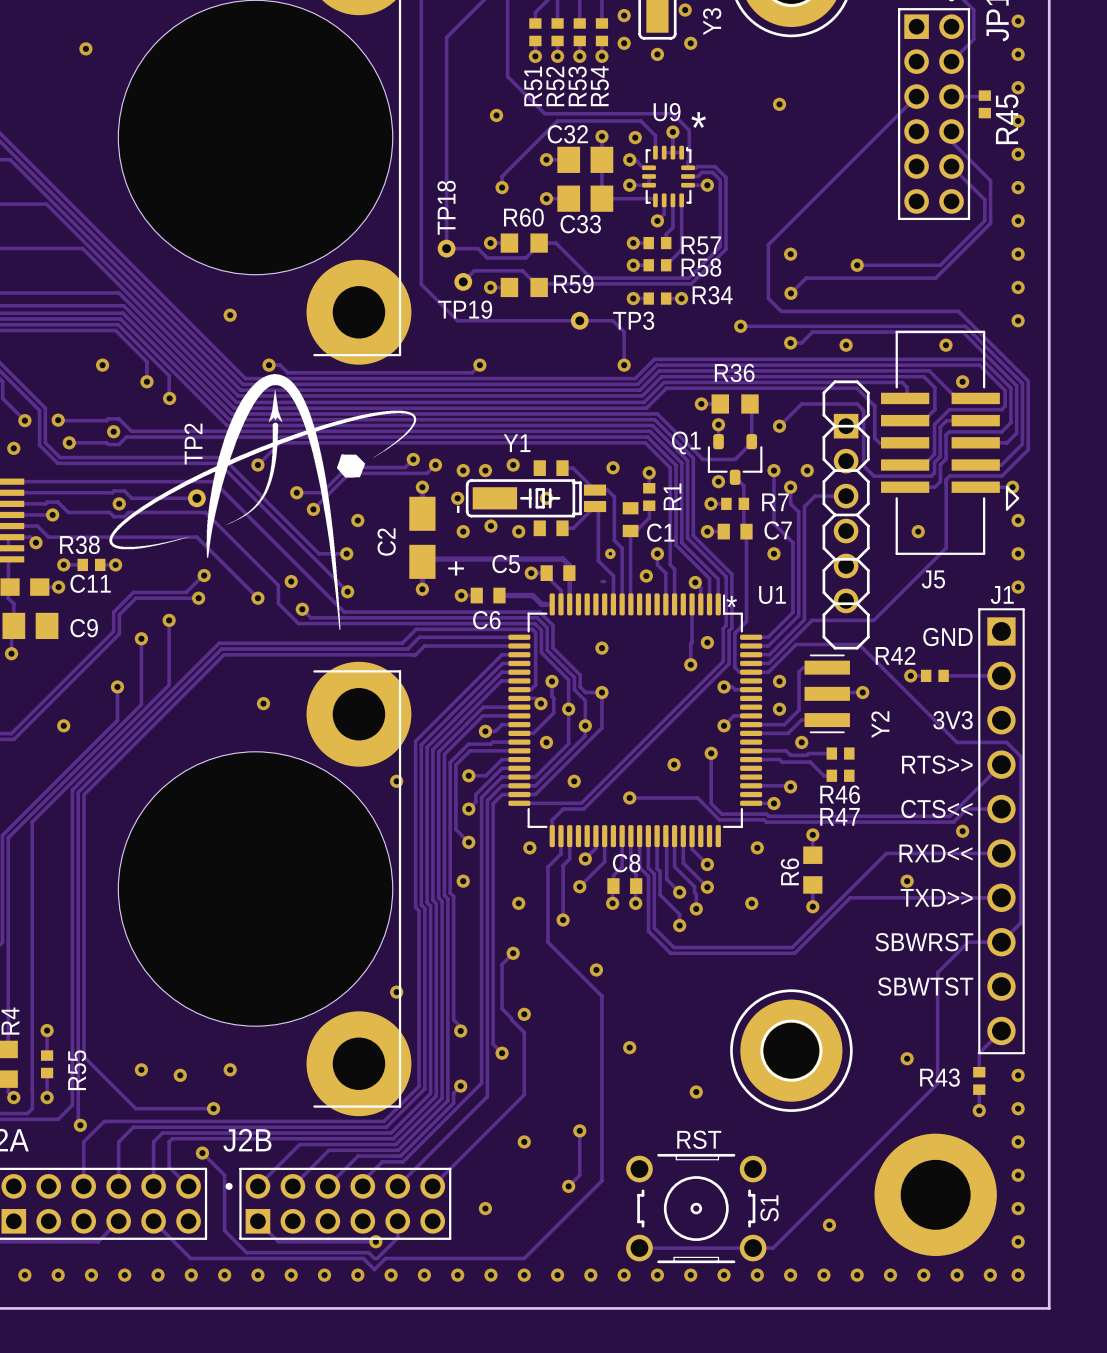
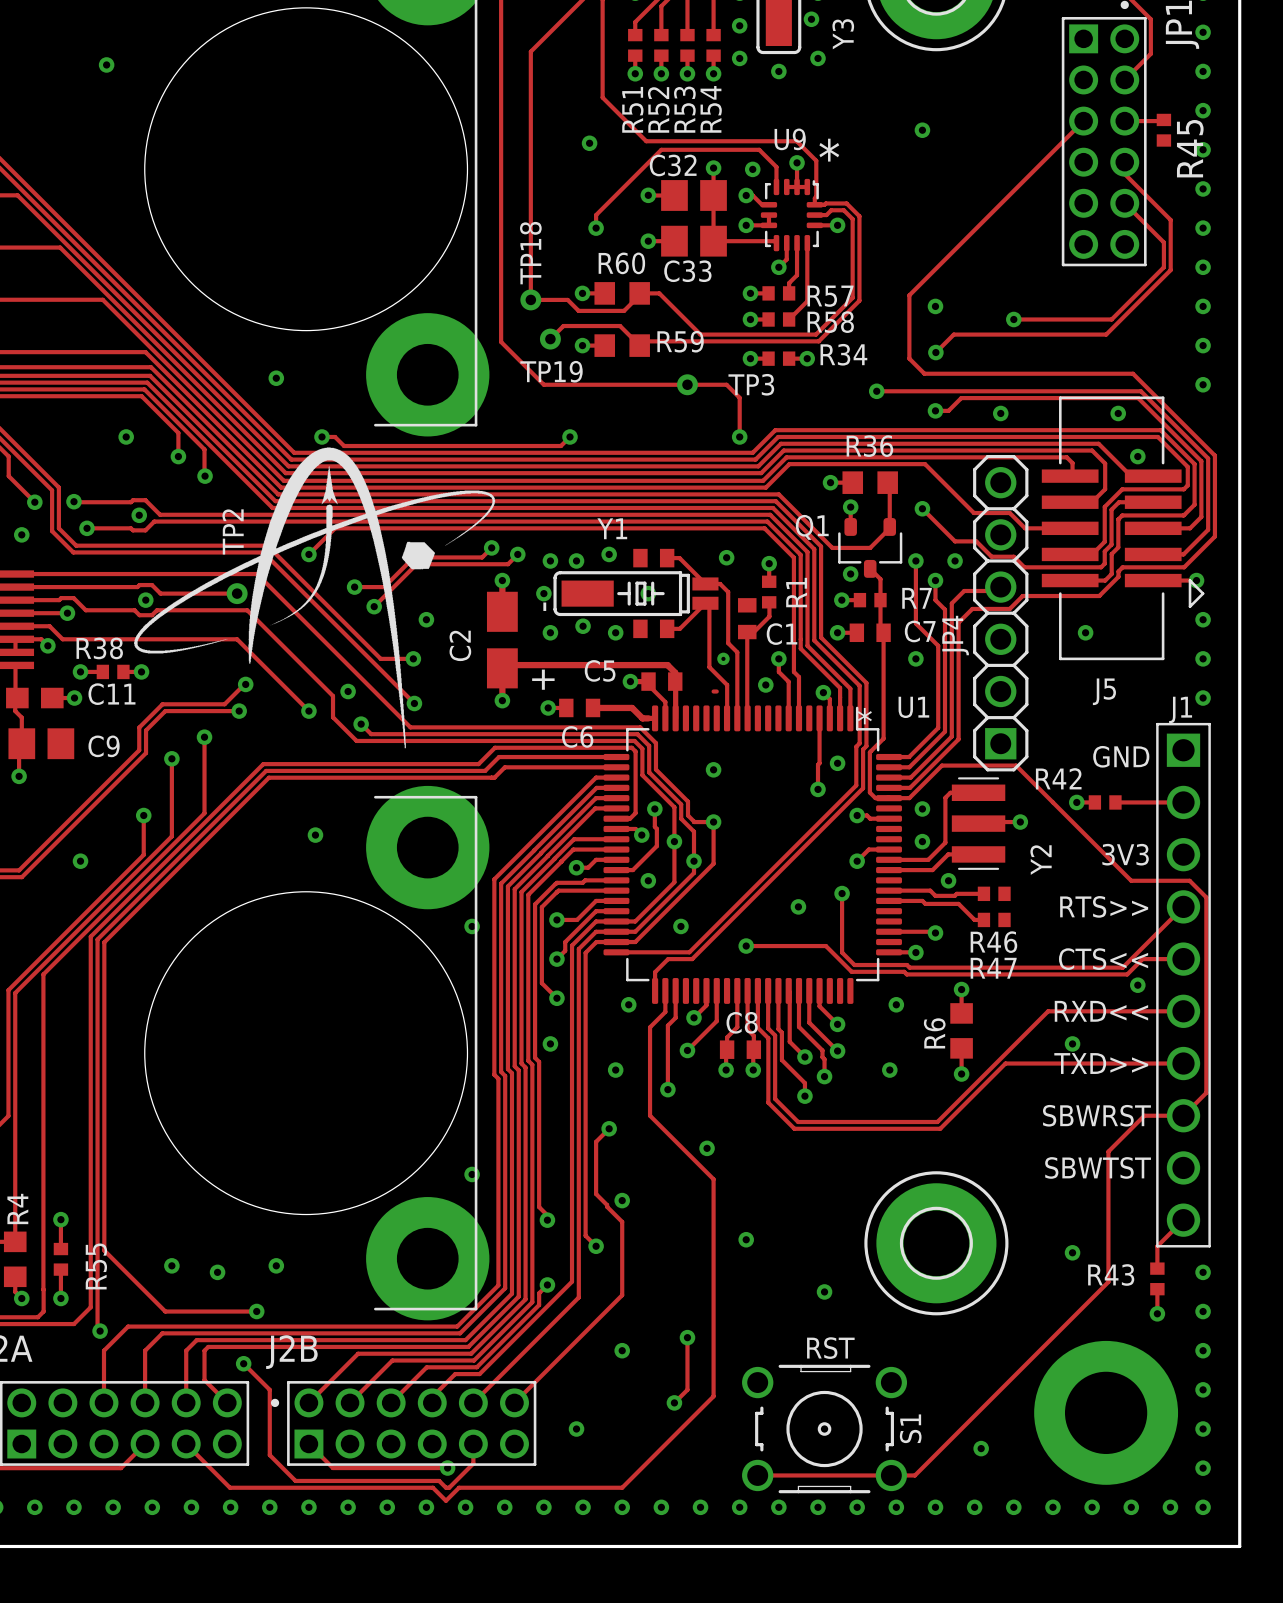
track: (781, 388) (856, 388) (874, 406) (874, 438) (879, 442) -> (925, 464) (973, 513) (1009, 513) (1025, 528) (1039, 528)
track: (779, 426) (801, 403) (857, 403) (863, 411) (863, 465) (873, 476) (931, 476) -> (922, 508) (955, 541) (976, 541) (991, 556) (1013, 556) (1024, 567) (1101, 567)
track: (946, 484) (946, 548) (873, 620) (812, 620) (810, 622) -> (1118, 576) (1099, 596) (1022, 596) (1009, 608) (972, 608) (958, 622) (958, 739)
part: (846, 513) -> none
JP4: none -> (1000, 613)

